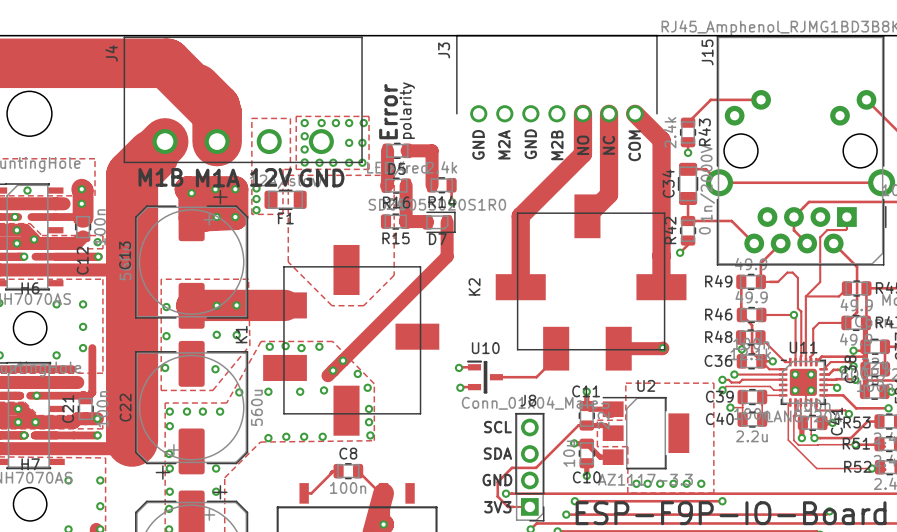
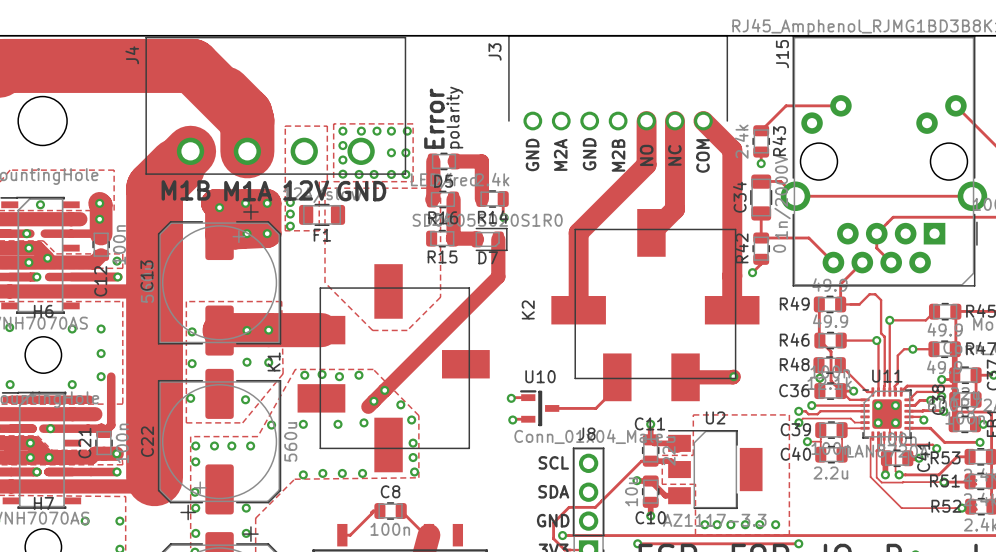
track: (846, 217) (845, 230) (827, 230) (820, 237) (820, 282) (805, 296) -> none
track: (833, 243) (857, 266) (857, 312) (846, 322) -> none
via: none -> (889, 320)
via: none -> (912, 349)

